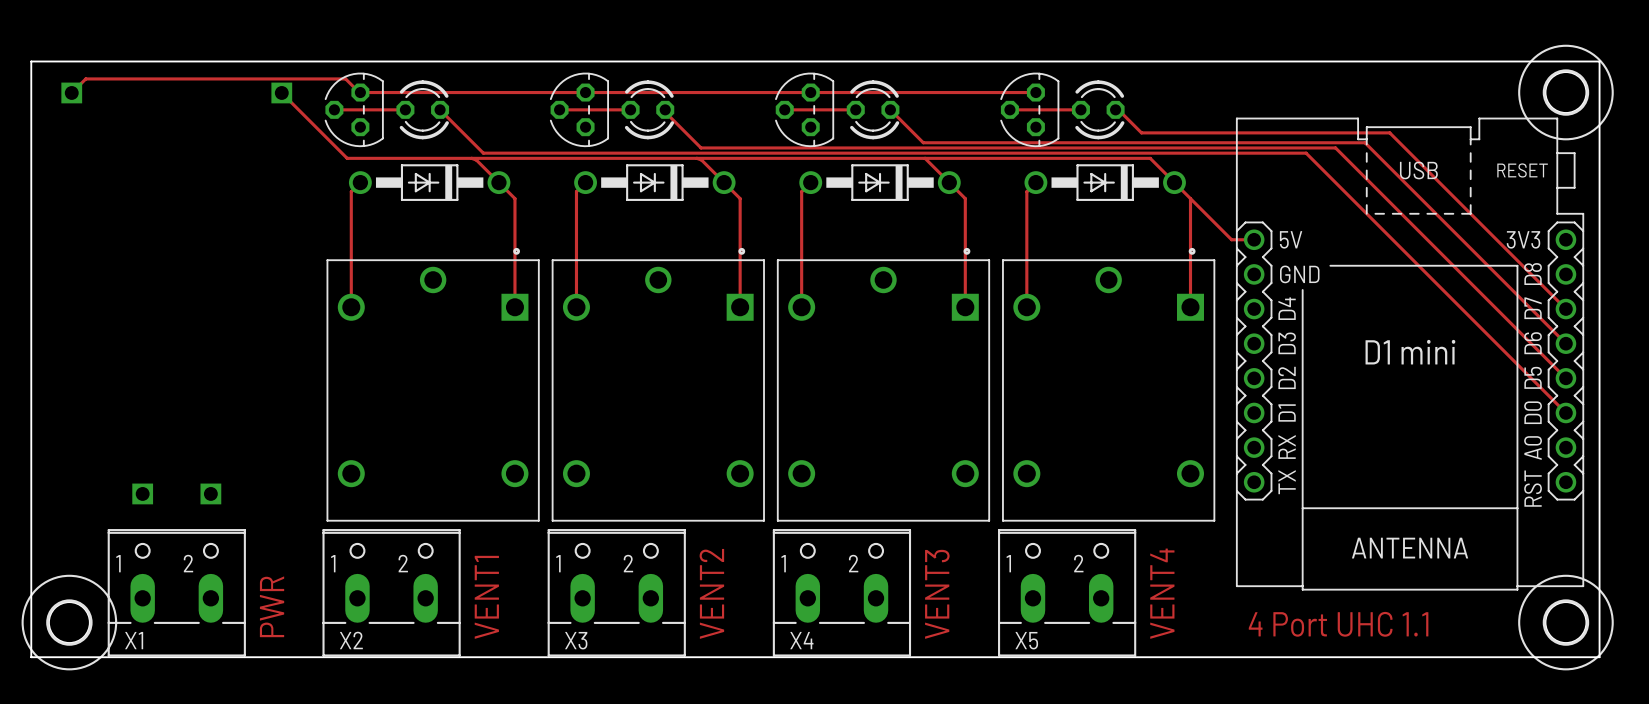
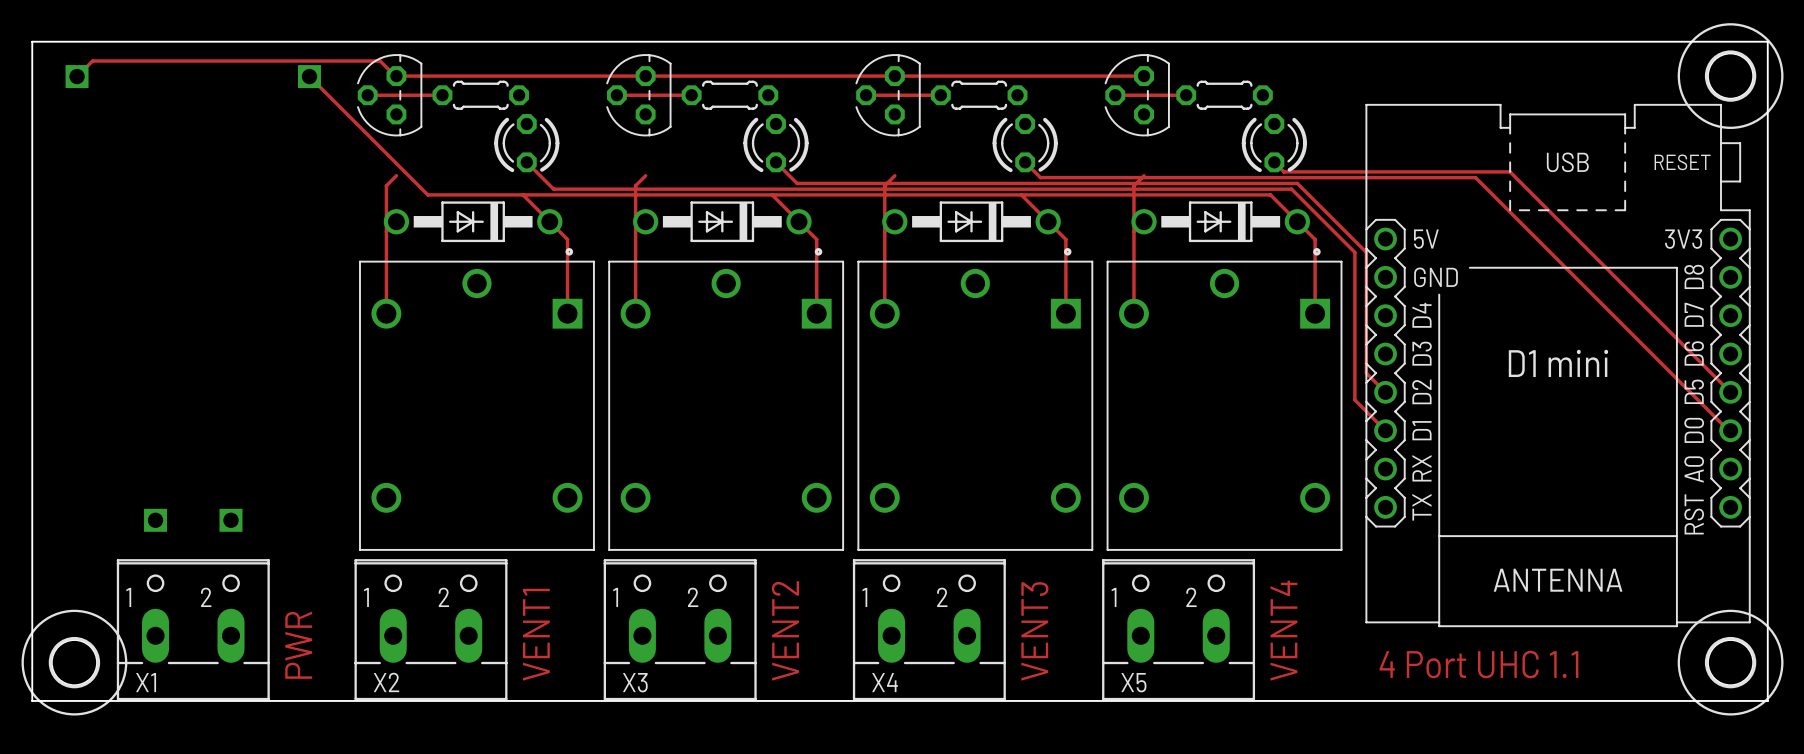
part footprint: [1071, 80, 1125, 140] -> [1176, 80, 1273, 110]
part rotation: 0° (422, 109) -> 90° clockwise (526, 143)
part position: (422, 109) -> (526, 143)
part: none -> (480, 95)
track: (440, 109) (483, 153) (1306, 153) (1565, 412) -> (1025, 162) (1040, 177) (1475, 177) (1730, 430)
part rotation: 0° (647, 109) -> 90° clockwise (775, 143)
part position: (647, 109) -> (775, 143)
part: none -> (729, 95)
track: (665, 109) (662, 109) (701, 147) (1335, 147) (1366, 179) -> (1274, 162) (1283, 171) (1510, 171)
part rotation: 0° (873, 109) -> 90° clockwise (1025, 143)
part position: (873, 109) -> (1025, 143)
part: none -> (979, 95)
track: (890, 109) (923, 142) (1365, 142) (1565, 343) -> none
track: (1115, 109) (1118, 109) (1141, 132) (1389, 132) (1565, 309) -> none
part: none -> (1274, 143)
track: (347, 158) (1150, 158) (1231, 239) (1254, 239) -> (381, 148) (427, 194) (1270, 194) (1315, 239)
track: (471, 158) (476, 160) (514, 198) (514, 240) -> (522, 194) (567, 239)
track: (696, 158) (701, 160) (740, 198) (740, 240) -> (772, 194) (816, 239)
track: (925, 158) (965, 198) (965, 240) -> (1021, 194) (1065, 239)
track: none -> (526, 162) (553, 189) (1291, 189) (1354, 252) (1354, 400) (1385, 430)
track: none -> (775, 162) (797, 183) (1297, 183) (1366, 252) (1366, 373) (1385, 392)
part position: (429, 182) -> (473, 221)
part position: (654, 182) -> (722, 221)
part position: (880, 182) -> (971, 221)
part position: (1105, 182) -> (1220, 221)
track: (1190, 198) (1190, 240) -> none

